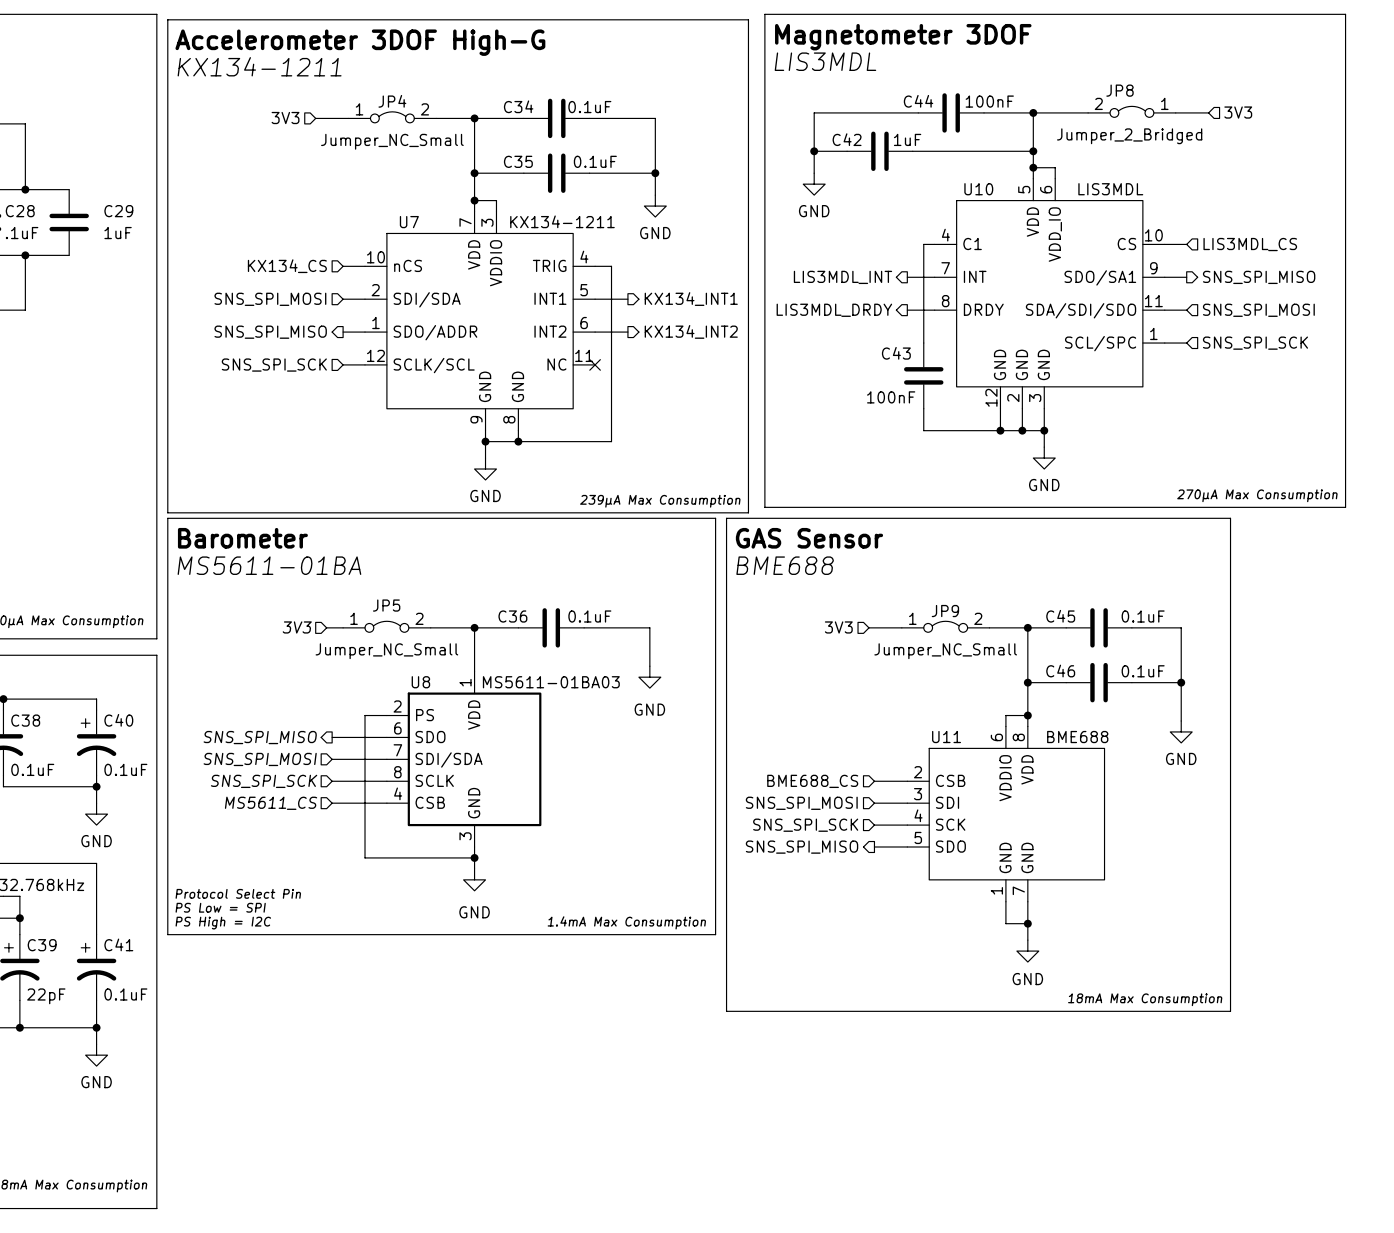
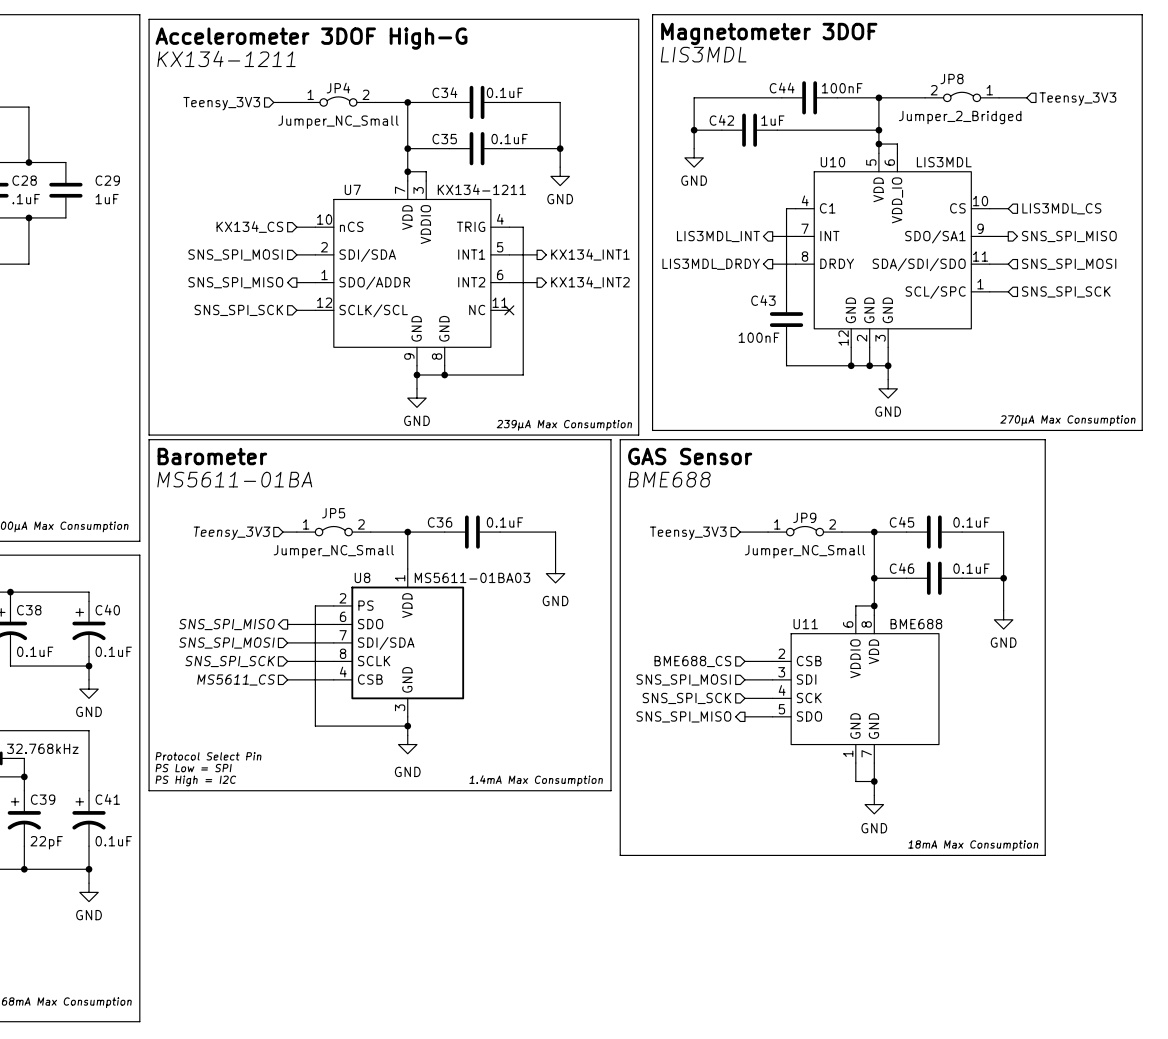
hierarchical label: 3V3 (1238, 112) -> Teensy_3V3 (1077, 99)
hierarchical label: 3V3 (285, 118) -> Teensy_3V3 (221, 103)
hierarchical label: 3V3 (297, 627) -> Teensy_3V3 (232, 533)
hierarchical label: 3V3 (838, 627) -> Teensy_3V3 (688, 533)

